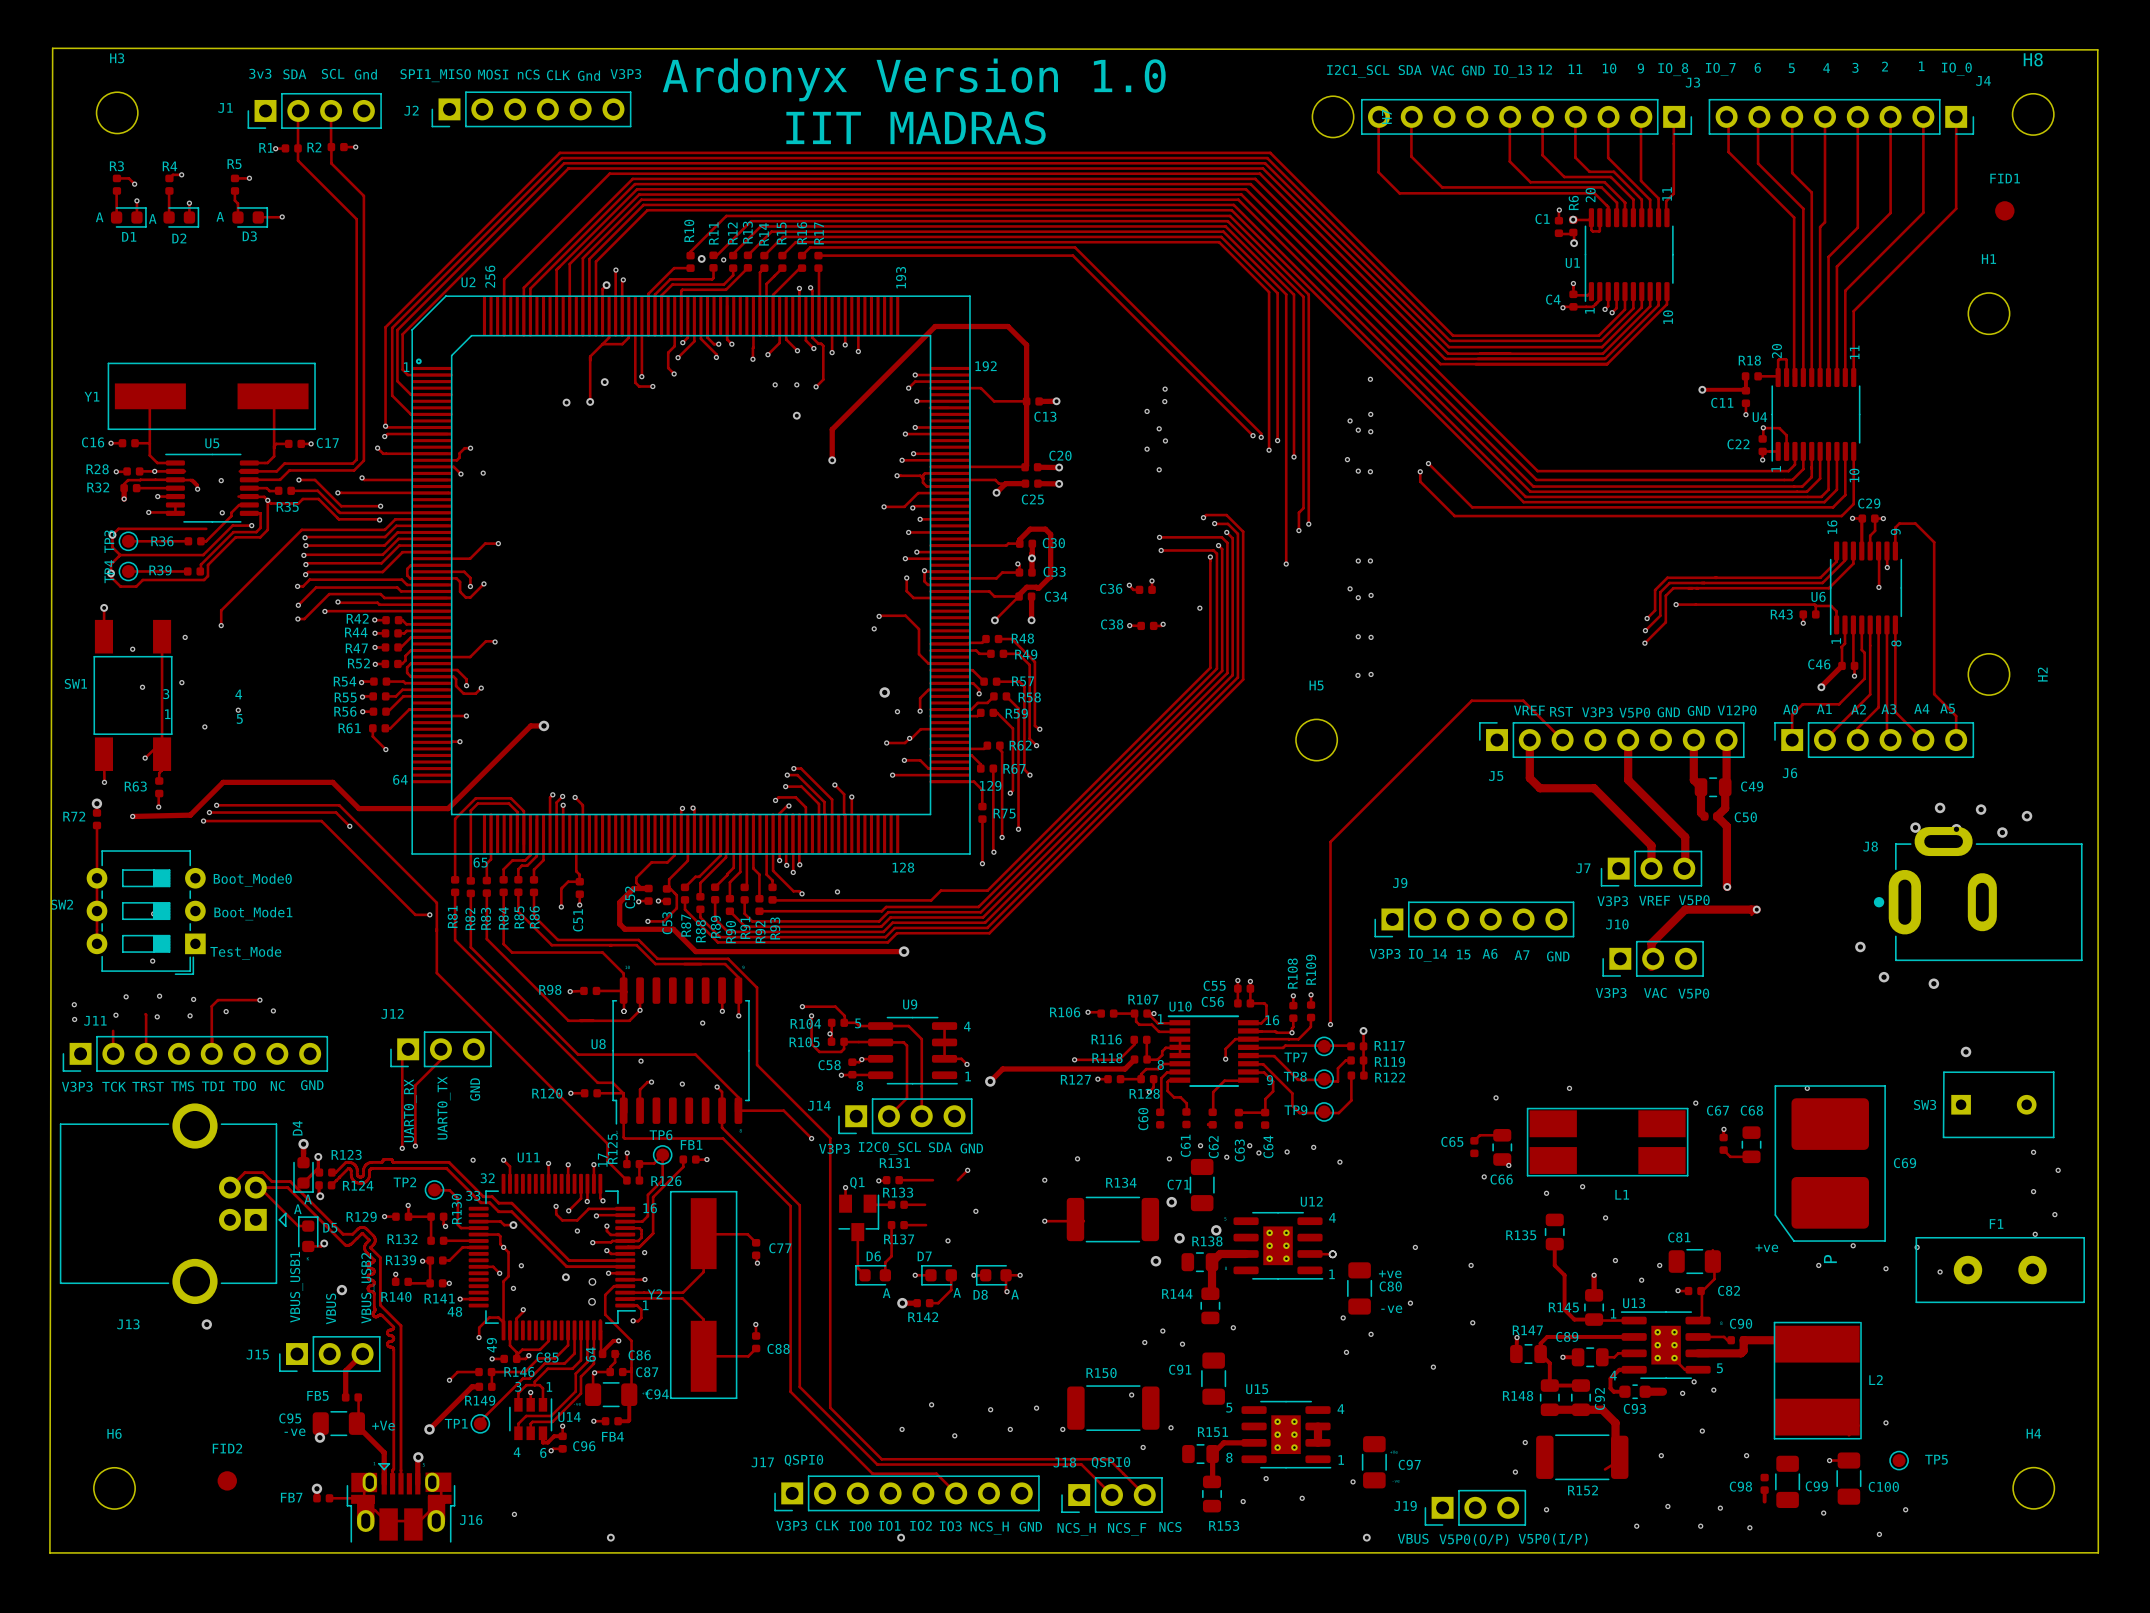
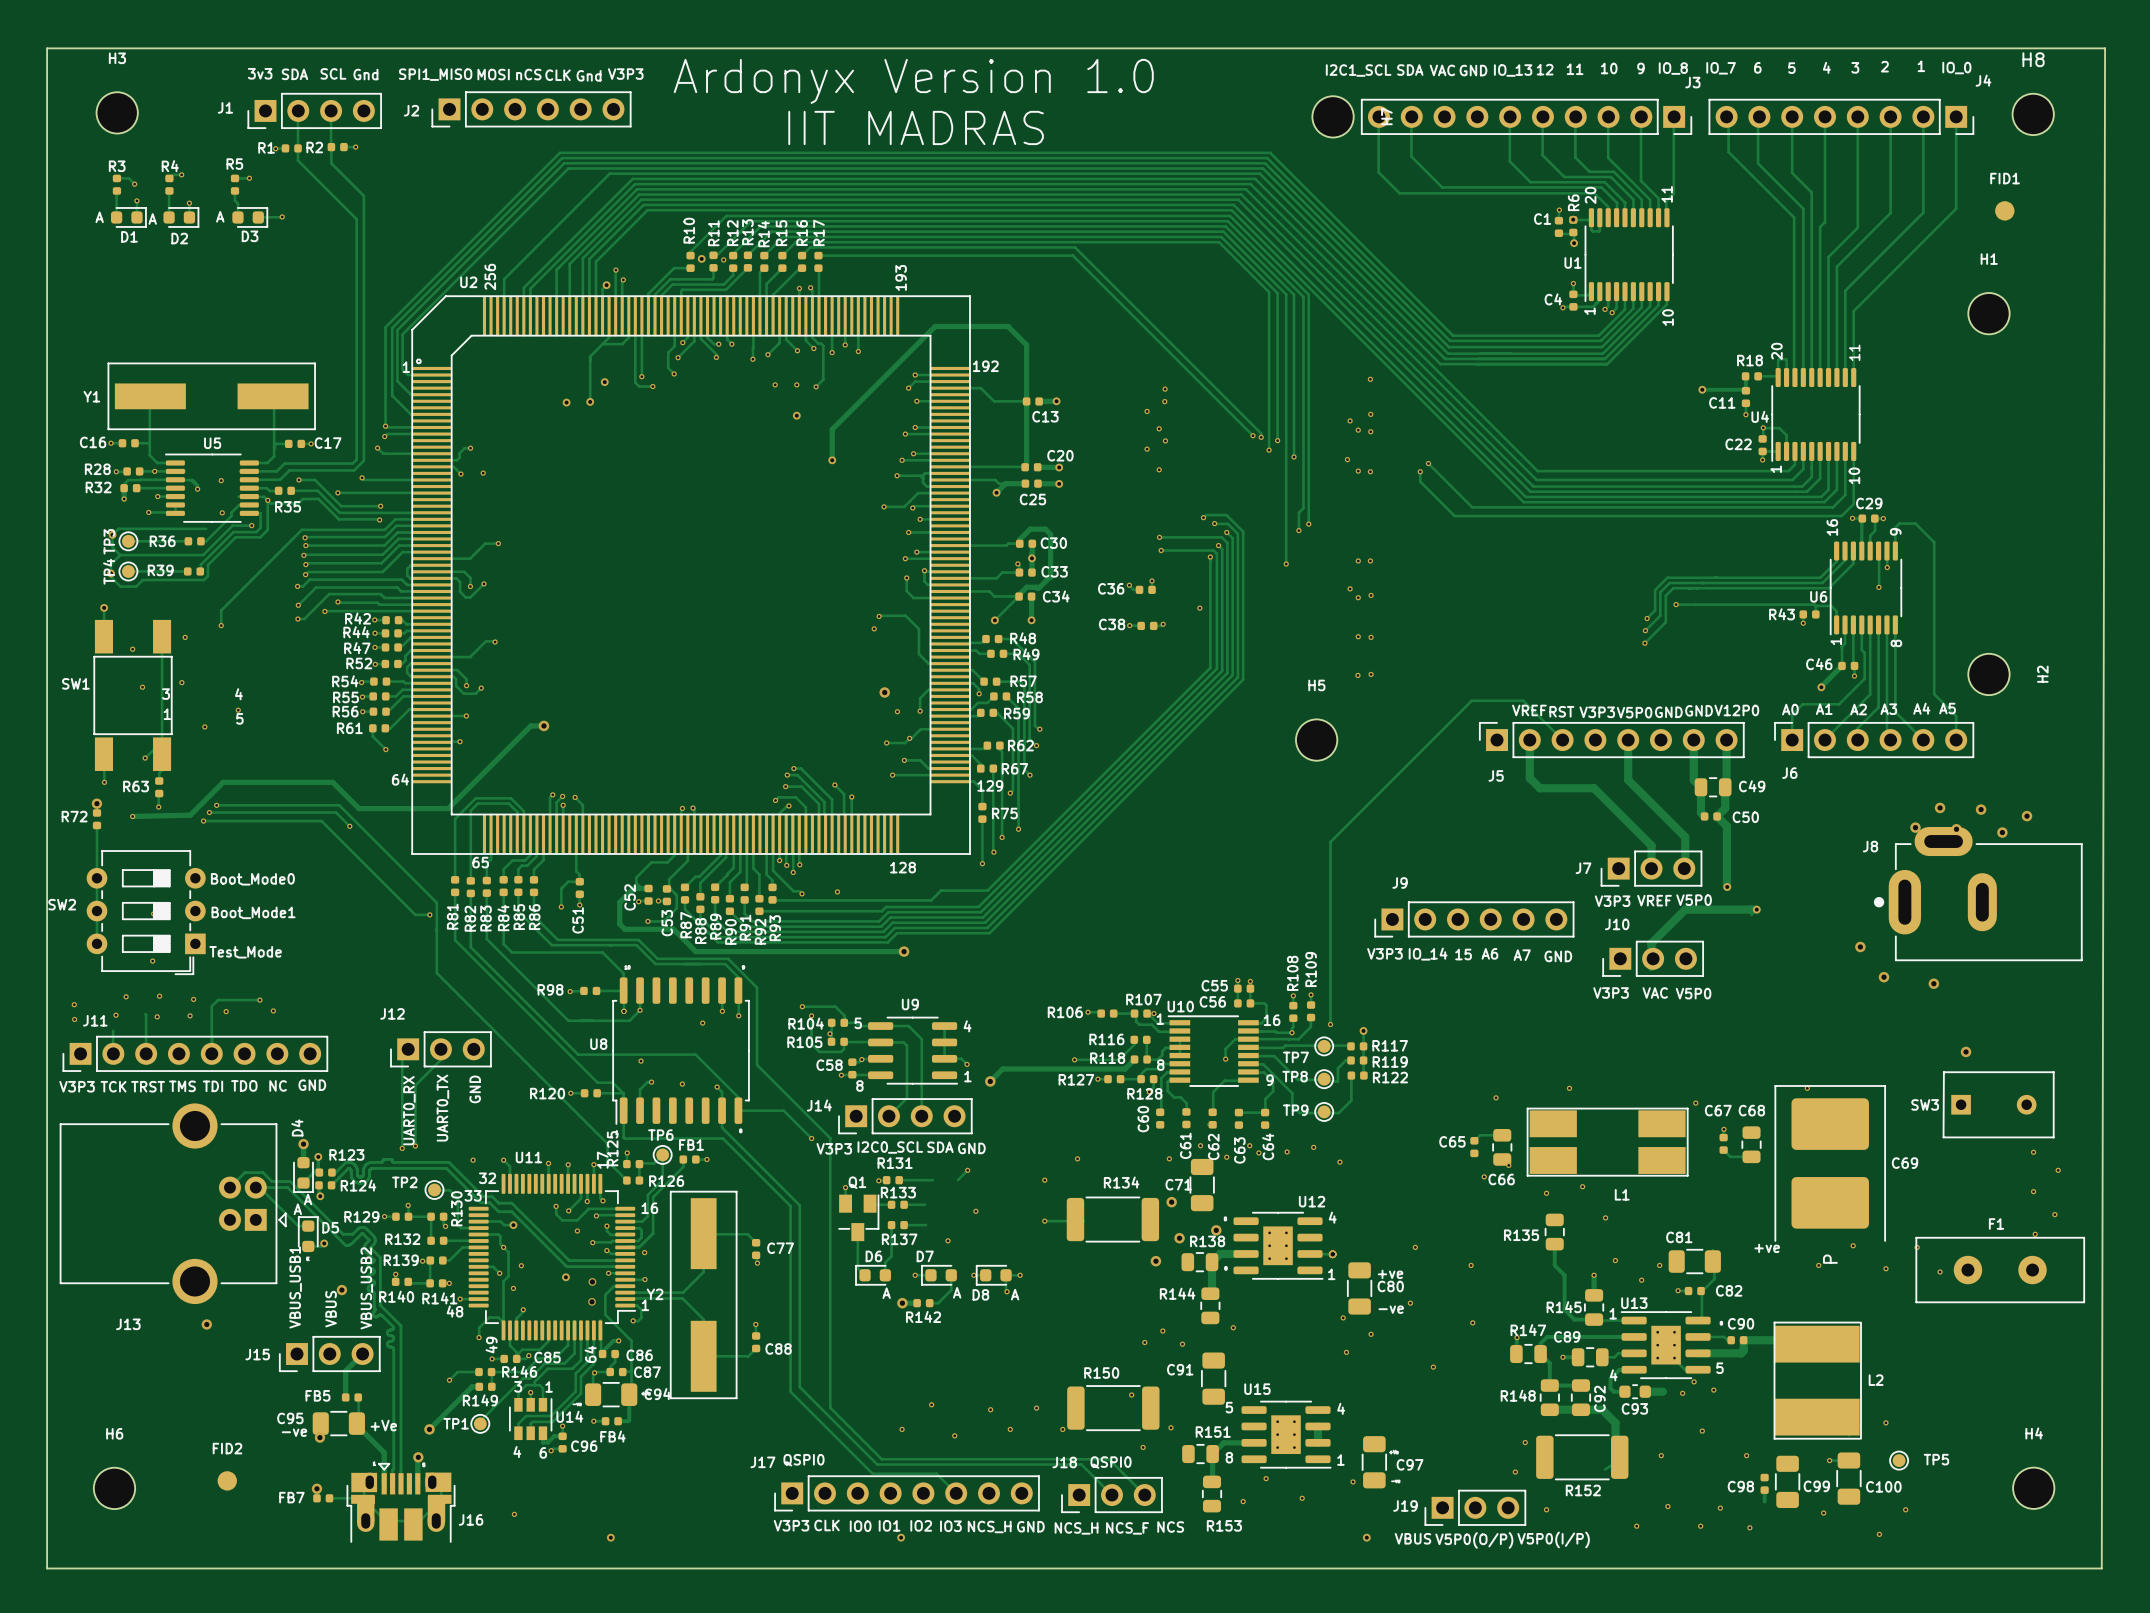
board edge: (52, 48) (2097, 49) (2098, 1552) (49, 1552) (52, 48) -> (47, 48) (47, 1568) (2101, 1568) (2105, 48) (47, 48)
C69 footprint: [1774, 1085, 1886, 1242] -> [1774, 1085, 1886, 1242]

